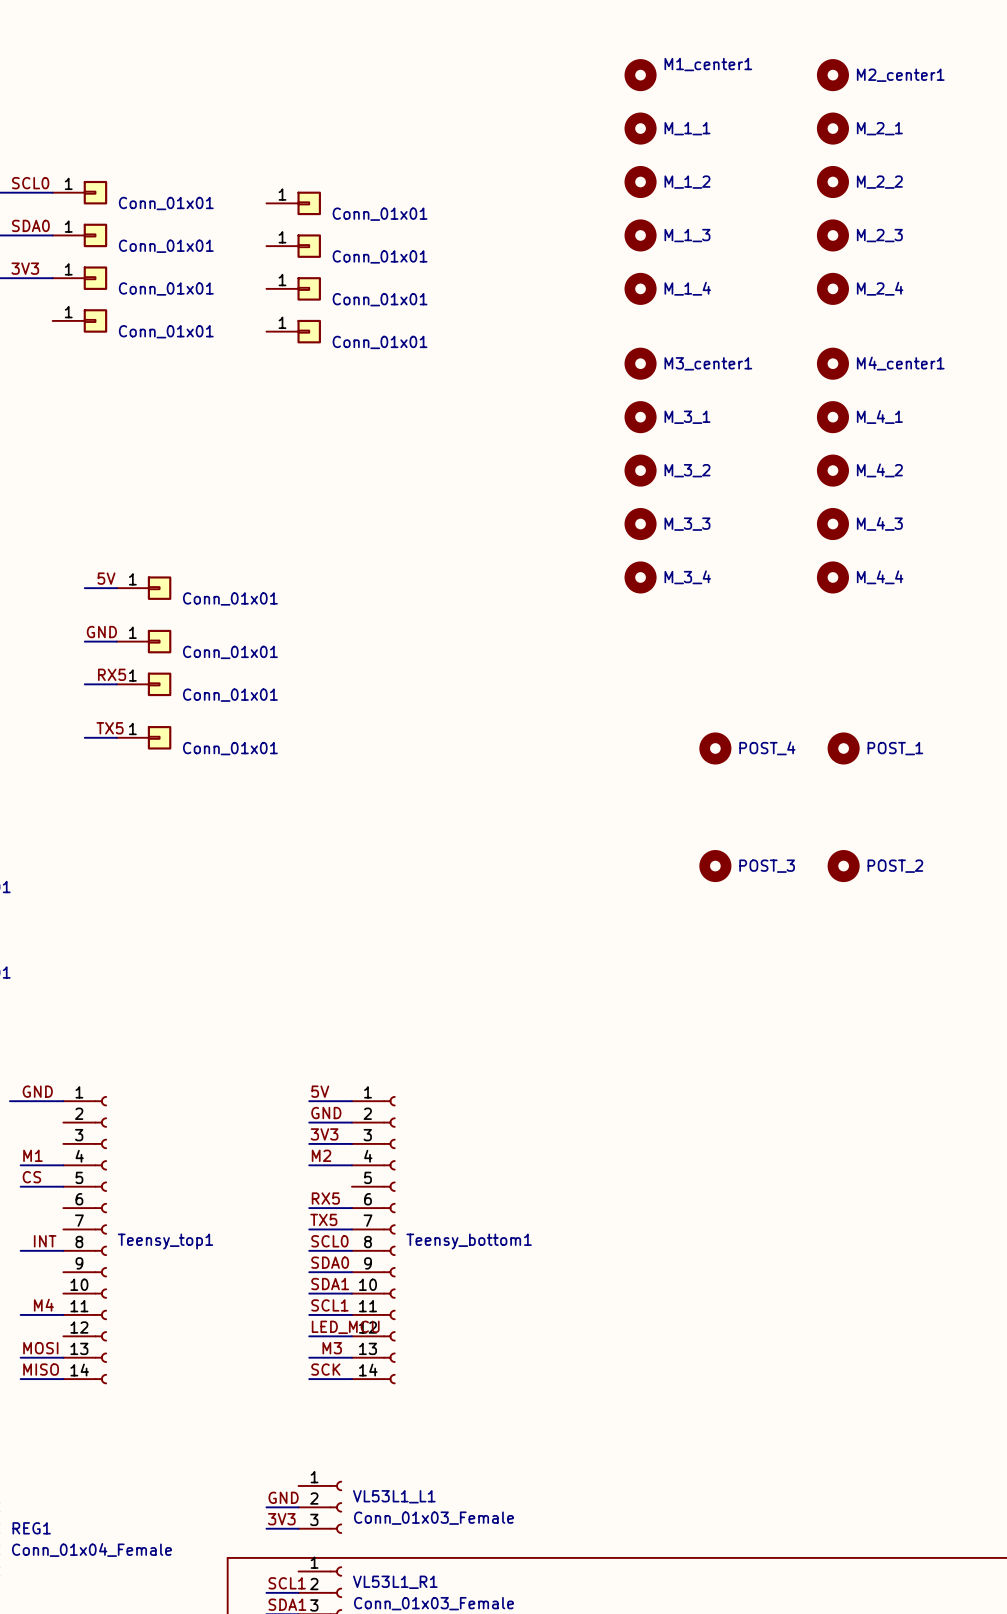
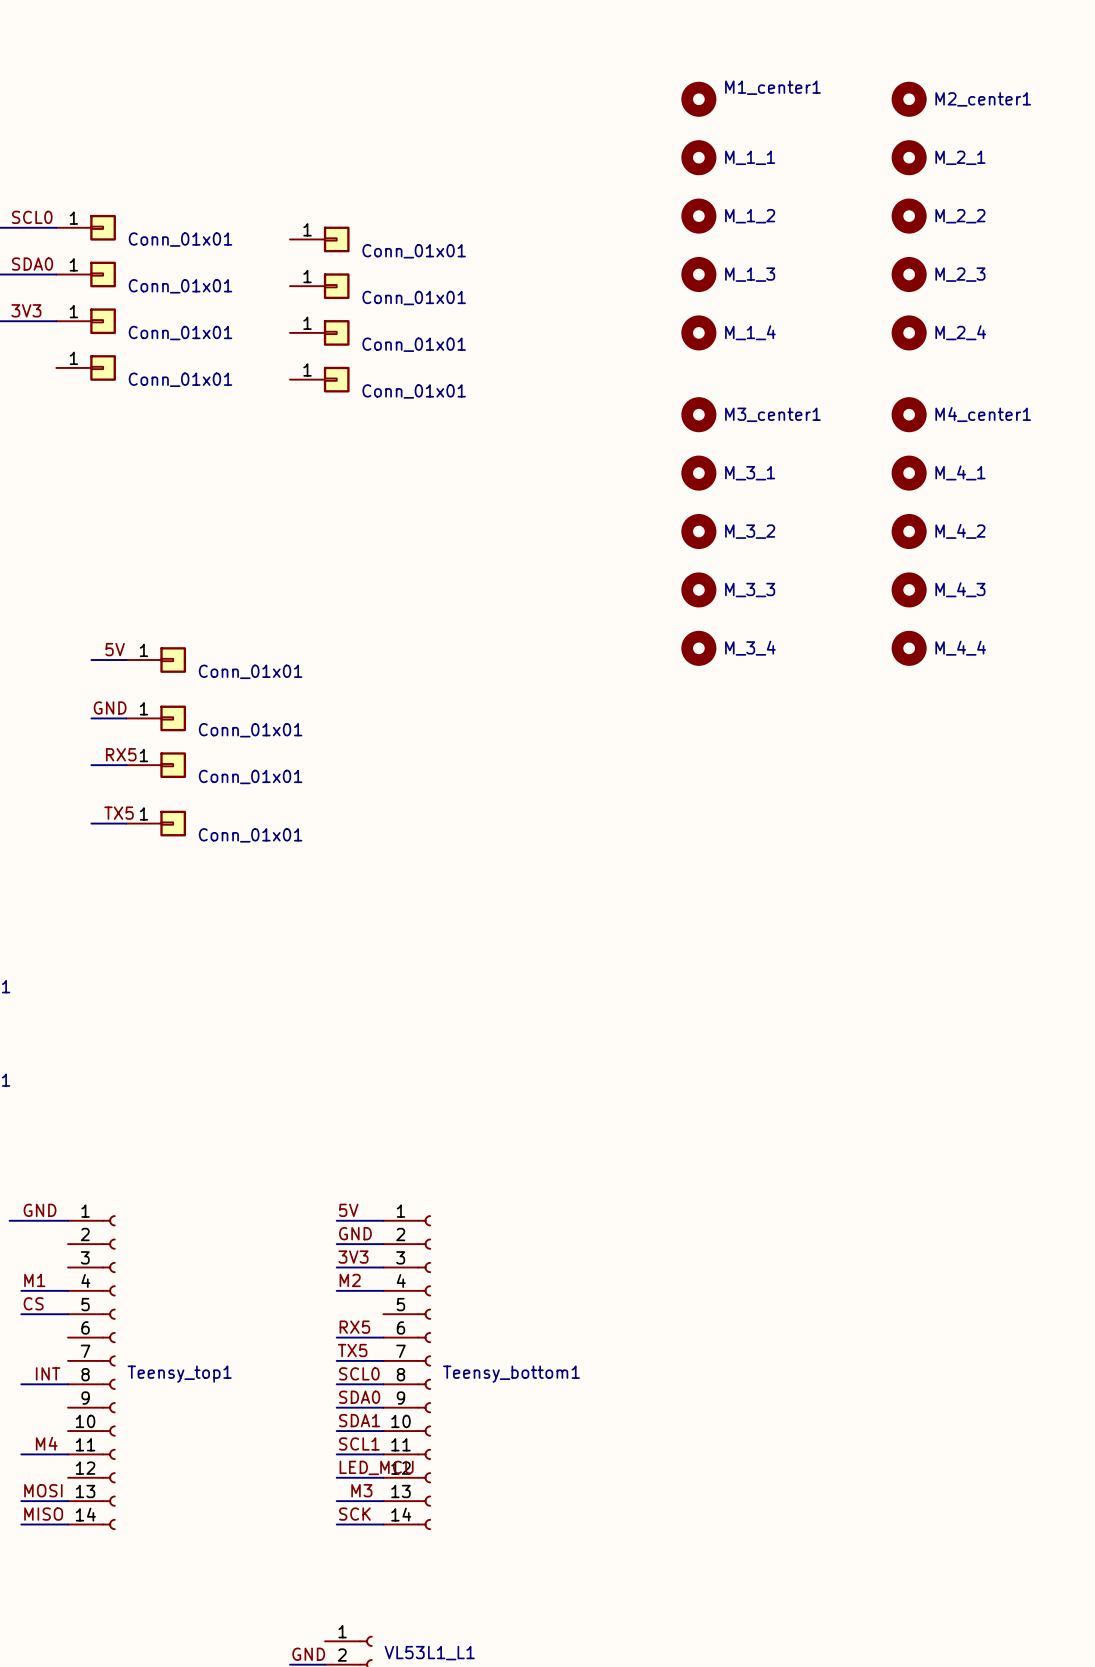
POST_4: (715, 748) -> none
POST_1: (843, 748) -> none
POST_3: (715, 866) -> none
POST_2: (843, 866) -> none

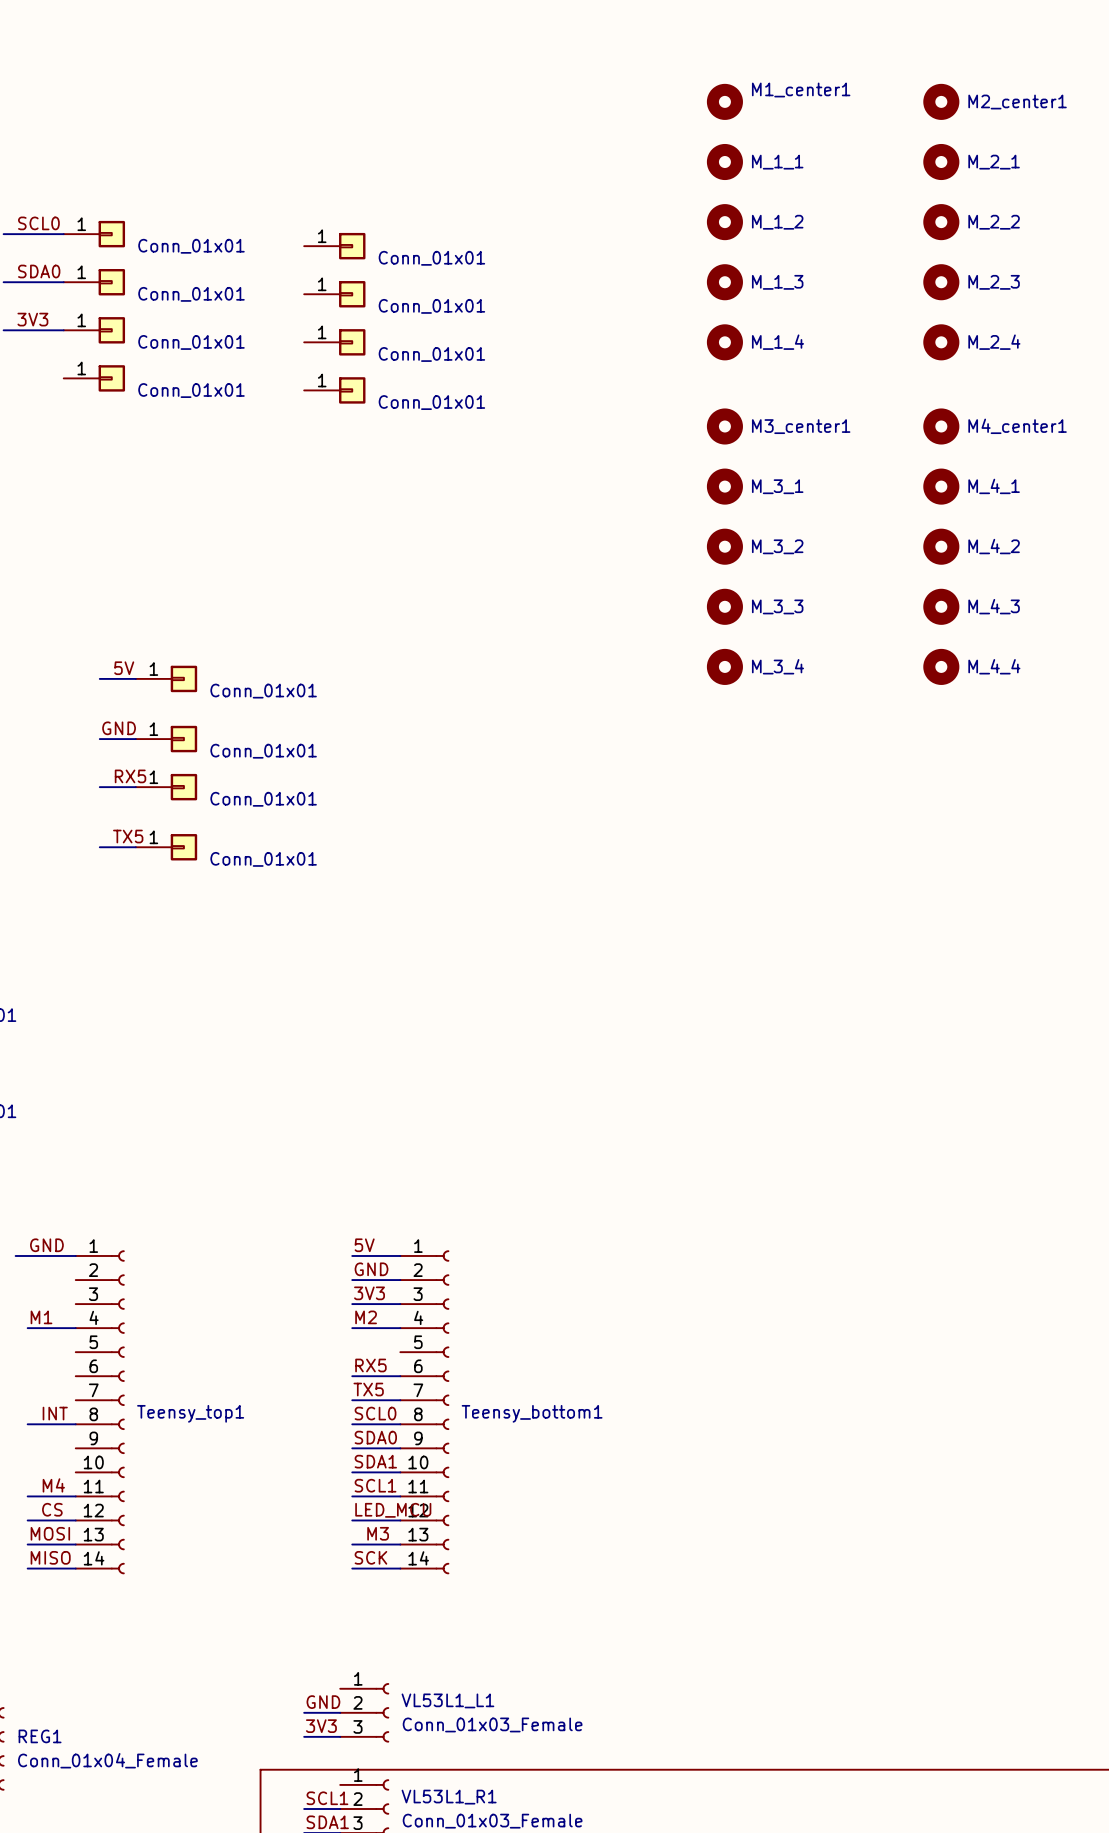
label position: CS (33, 1303) -> CS (52, 1509)
wire: (21, 1314) (68, 1314) -> (27, 1520) (75, 1520)

